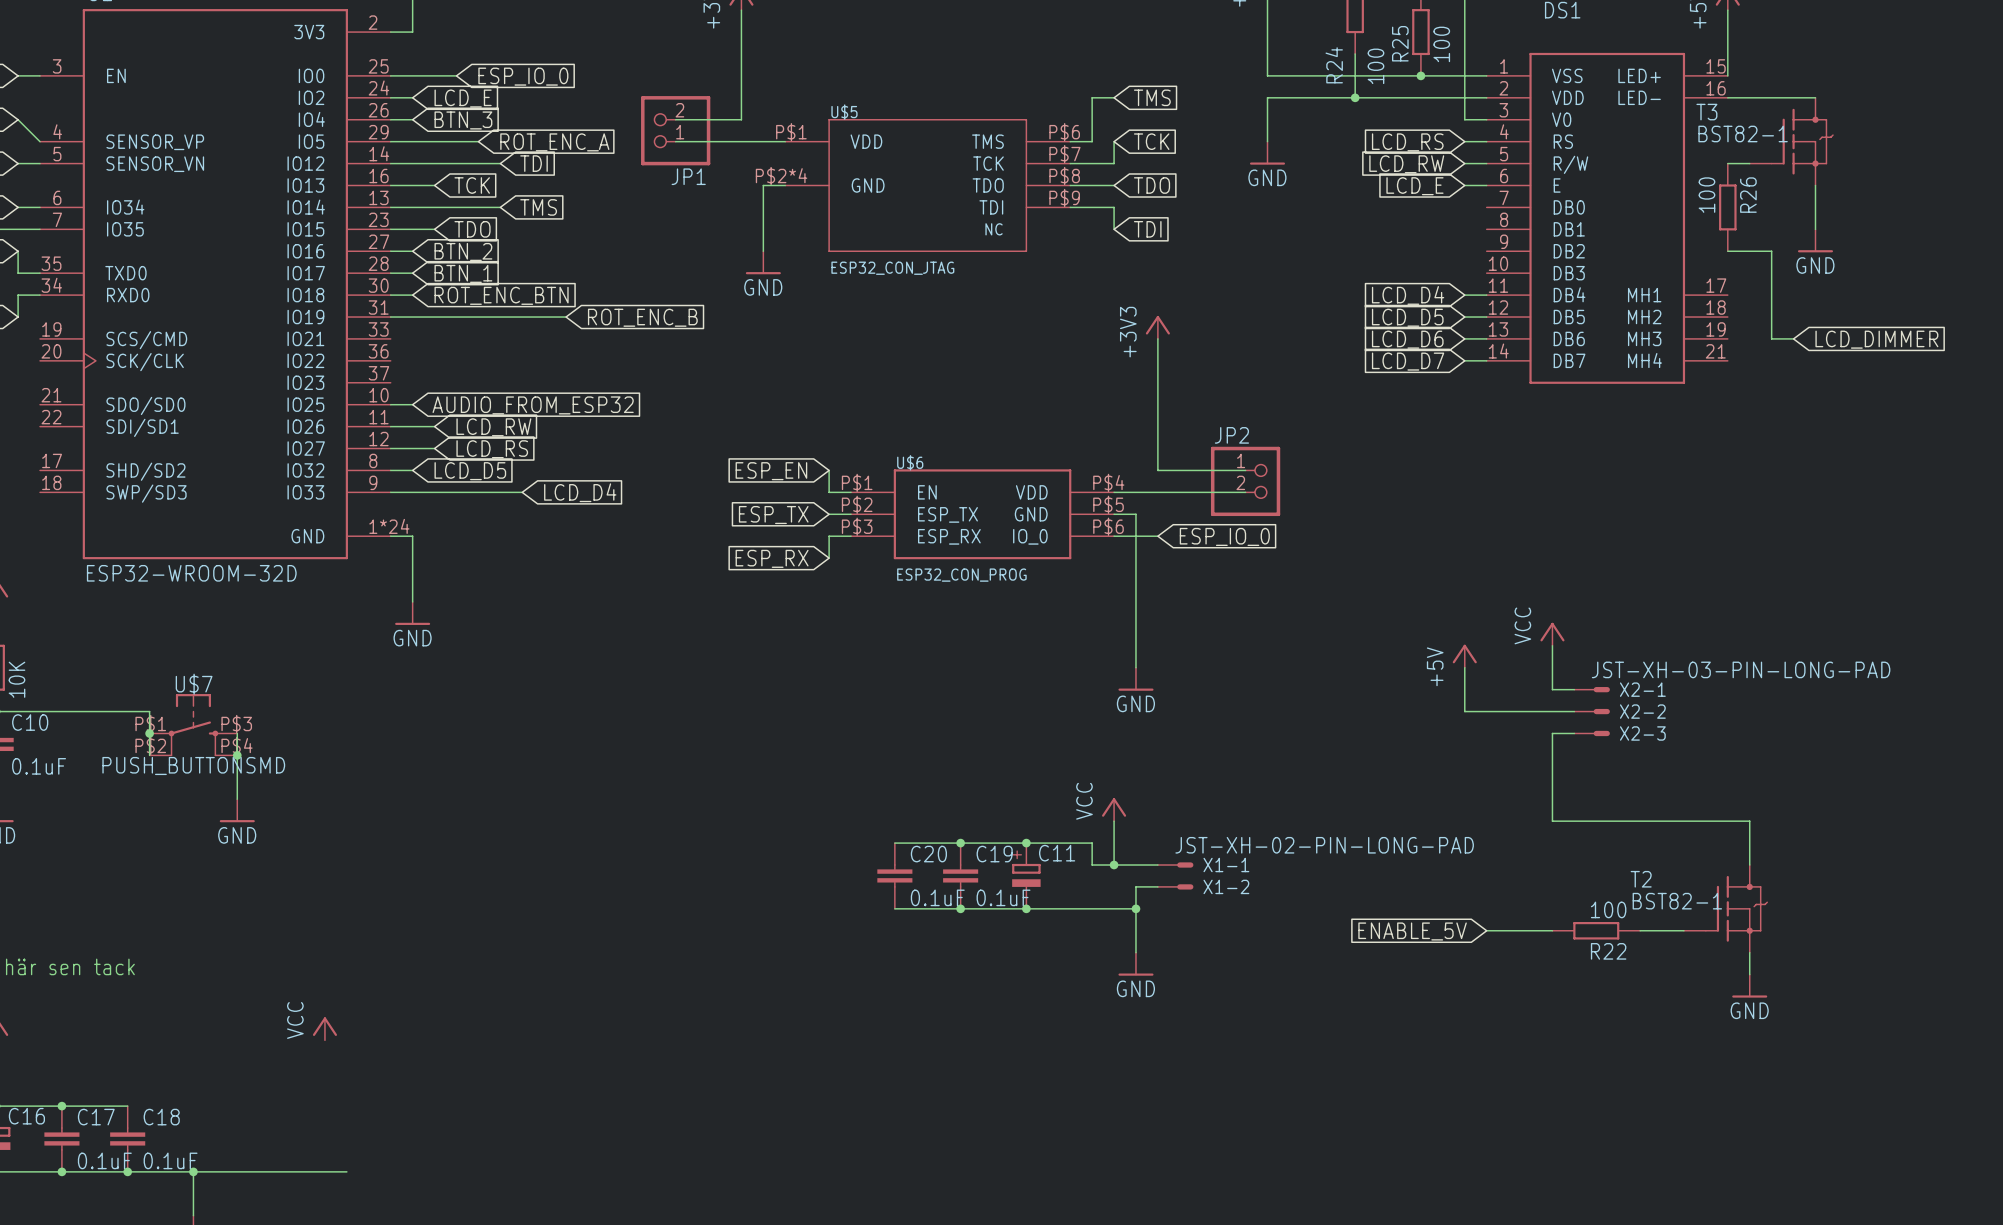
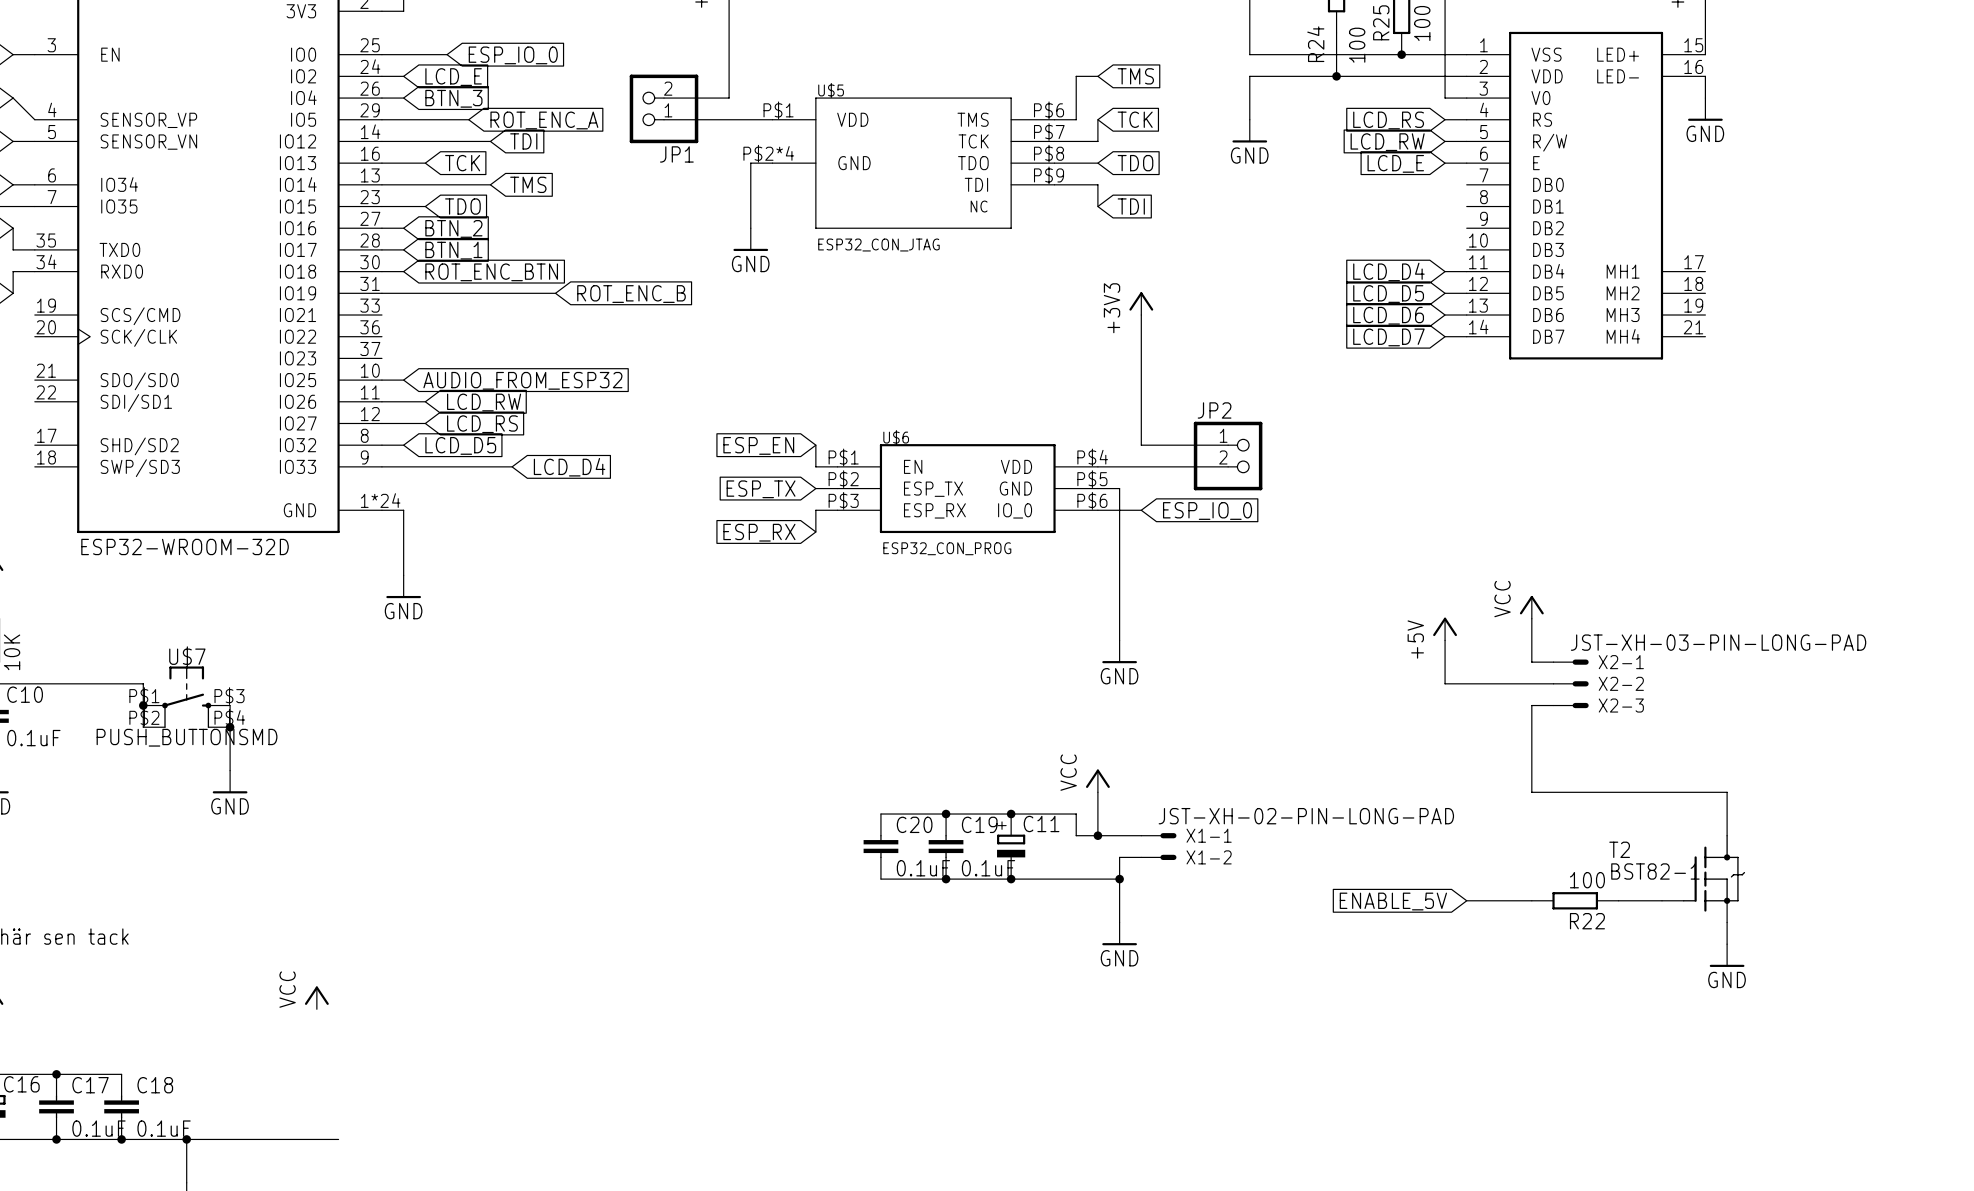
wire: (1727, 97) (1815, 97) -> (1705, 76) (1705, 98)
T3: BST82-1 (1791, 141) -> none
wire: (1727, 163) (1749, 163) -> none
wire: (1815, 185) (1815, 229) -> none
R26: 100 (1727, 207) -> none
power symbol position: GND (1815, 240) -> GND (1705, 109)
wire: (1727, 251) (1771, 251) (1771, 338) (1793, 338) -> none
global label: LCD_DIMMER (1876, 339) -> none

